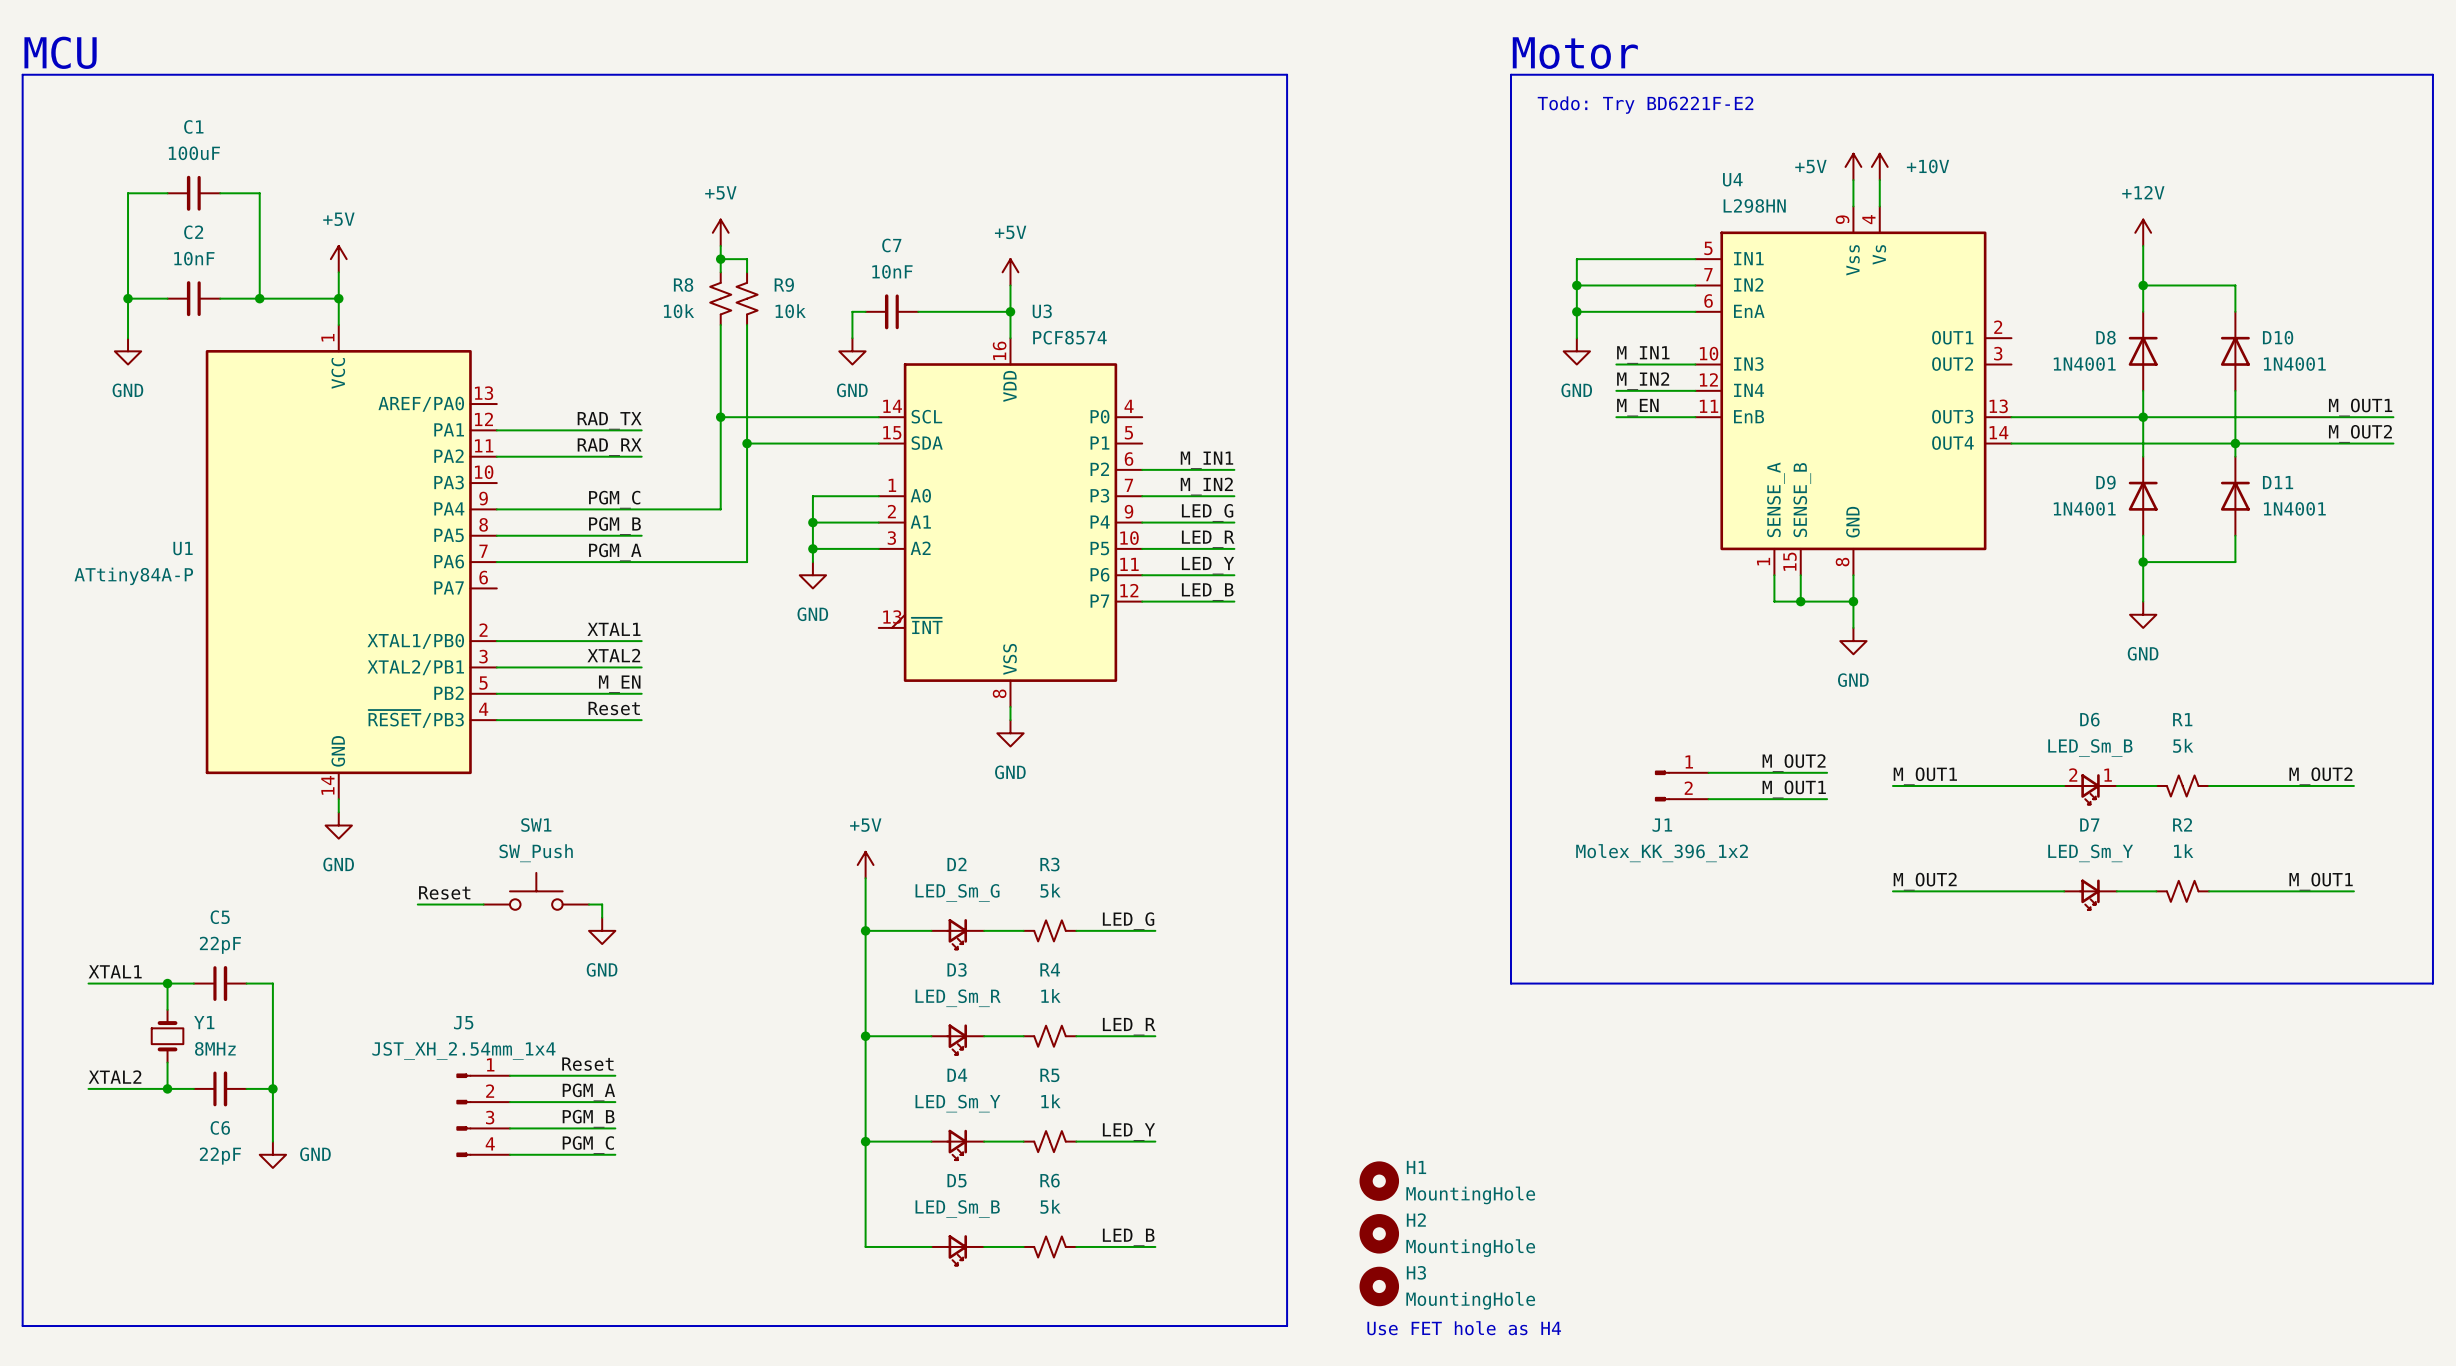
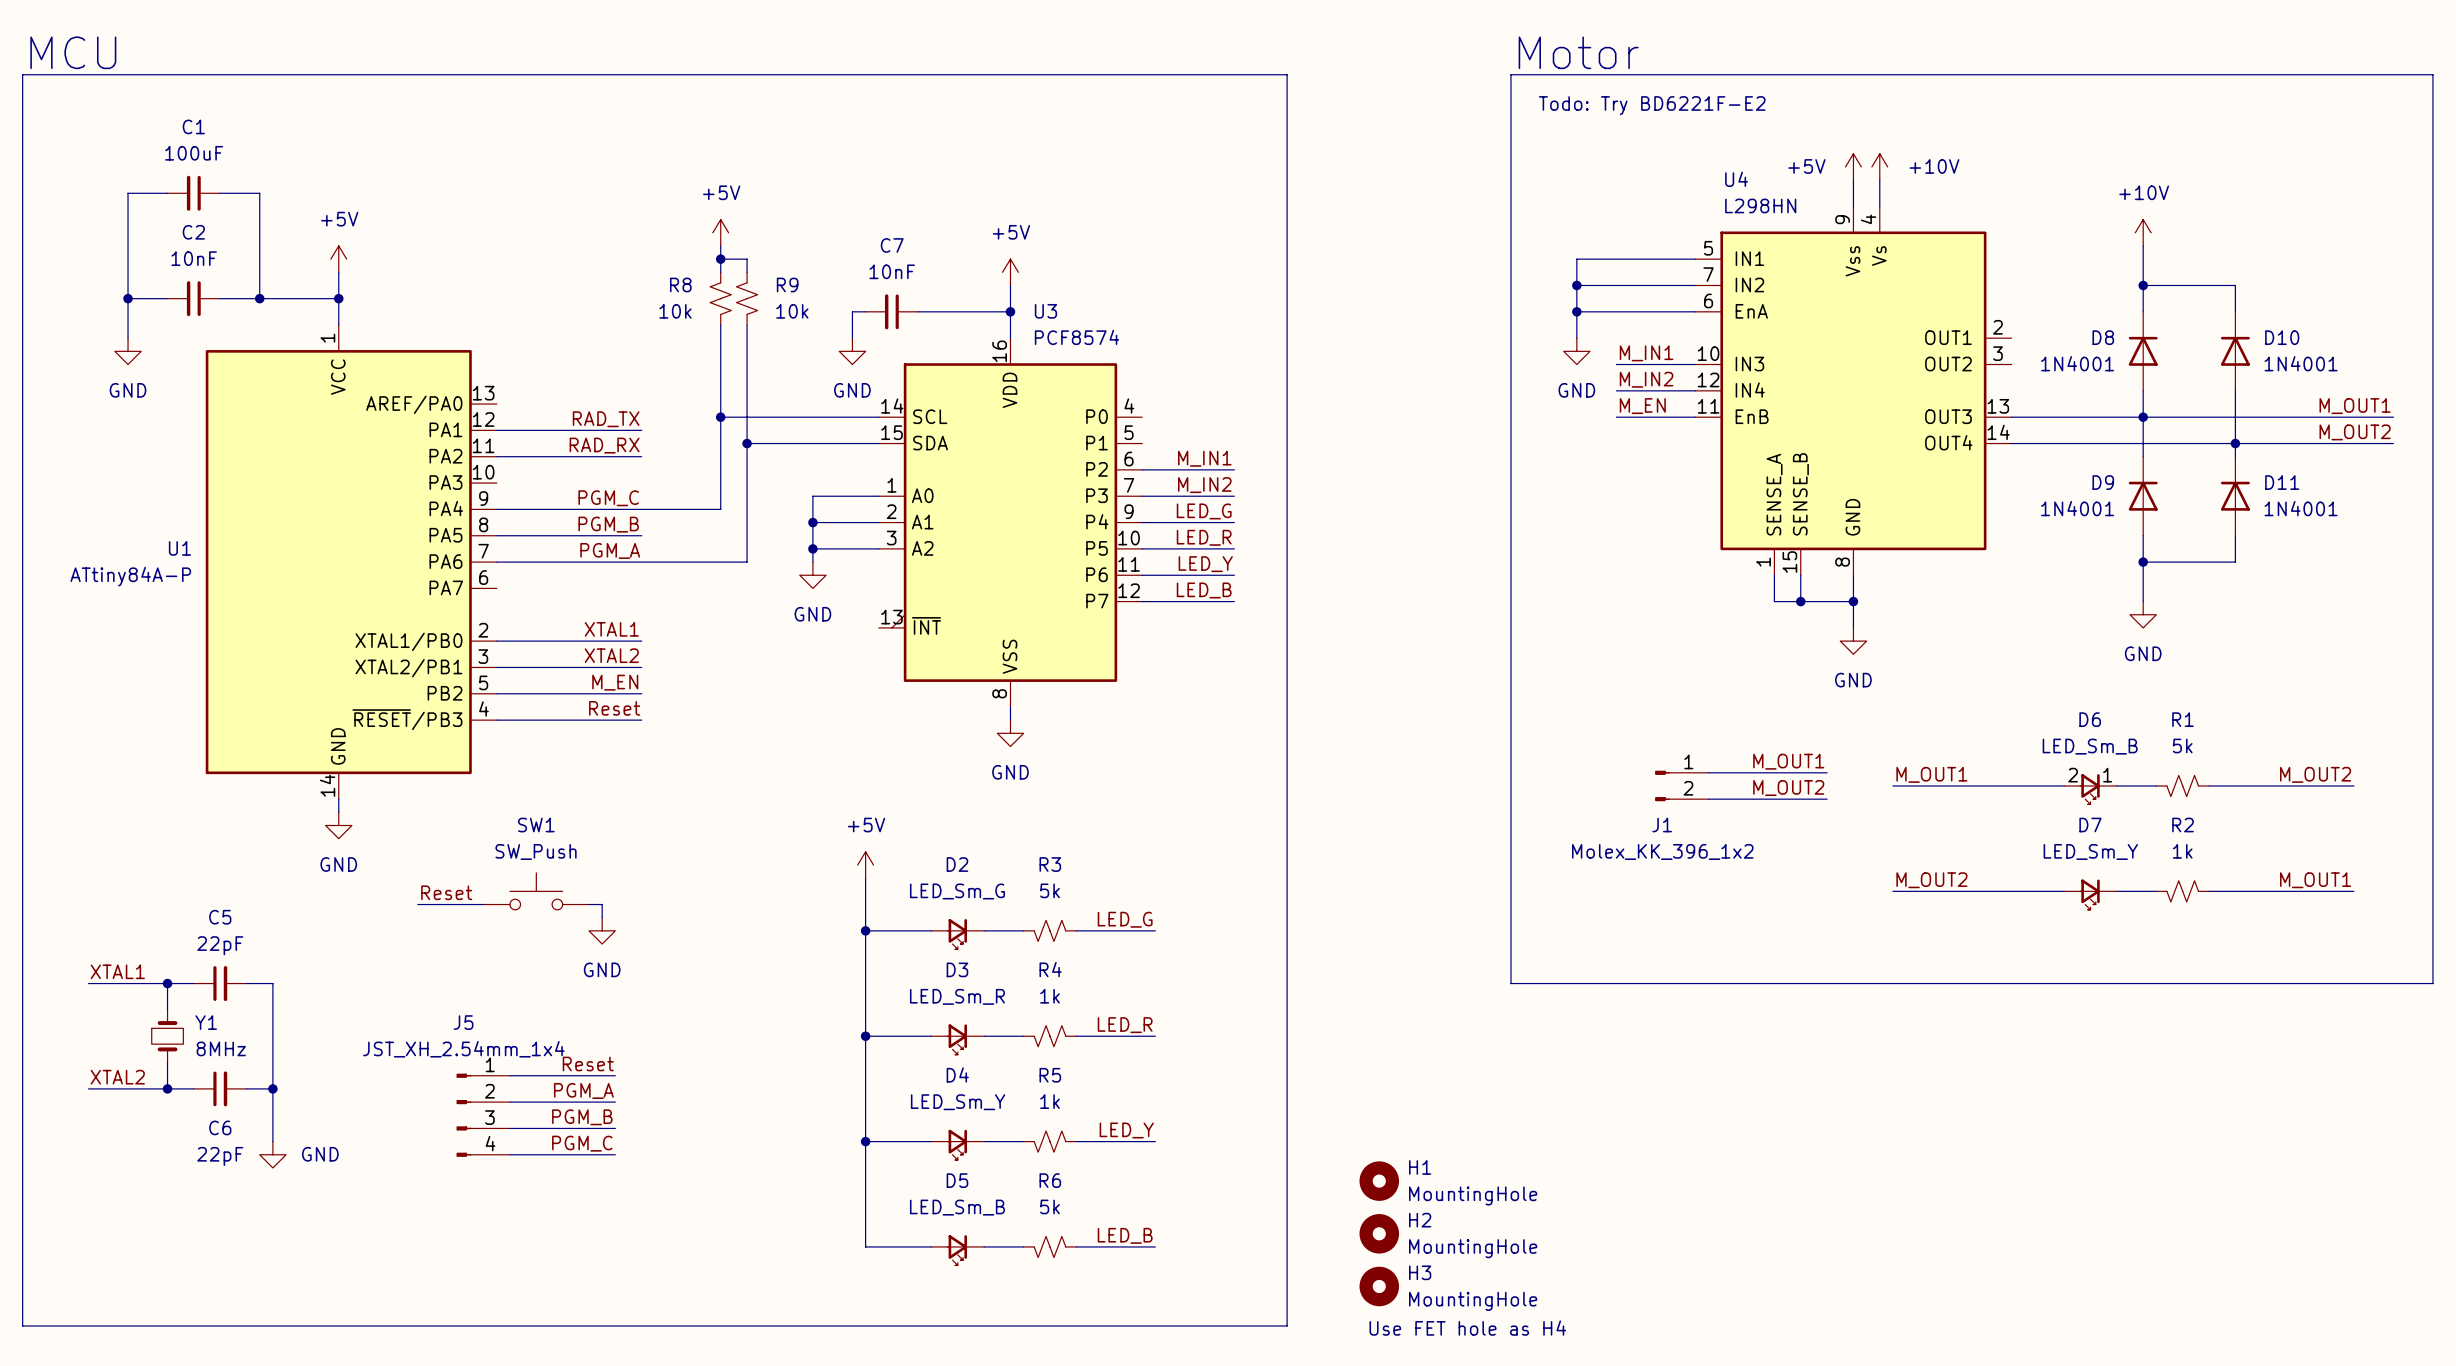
power symbol: +12V (2143, 232) -> +10V (2143, 232)
label: M_OUT2 (1794, 763) -> M_OUT1 (1788, 761)
label: M_OUT1 (1794, 789) -> M_OUT2 (1788, 788)

